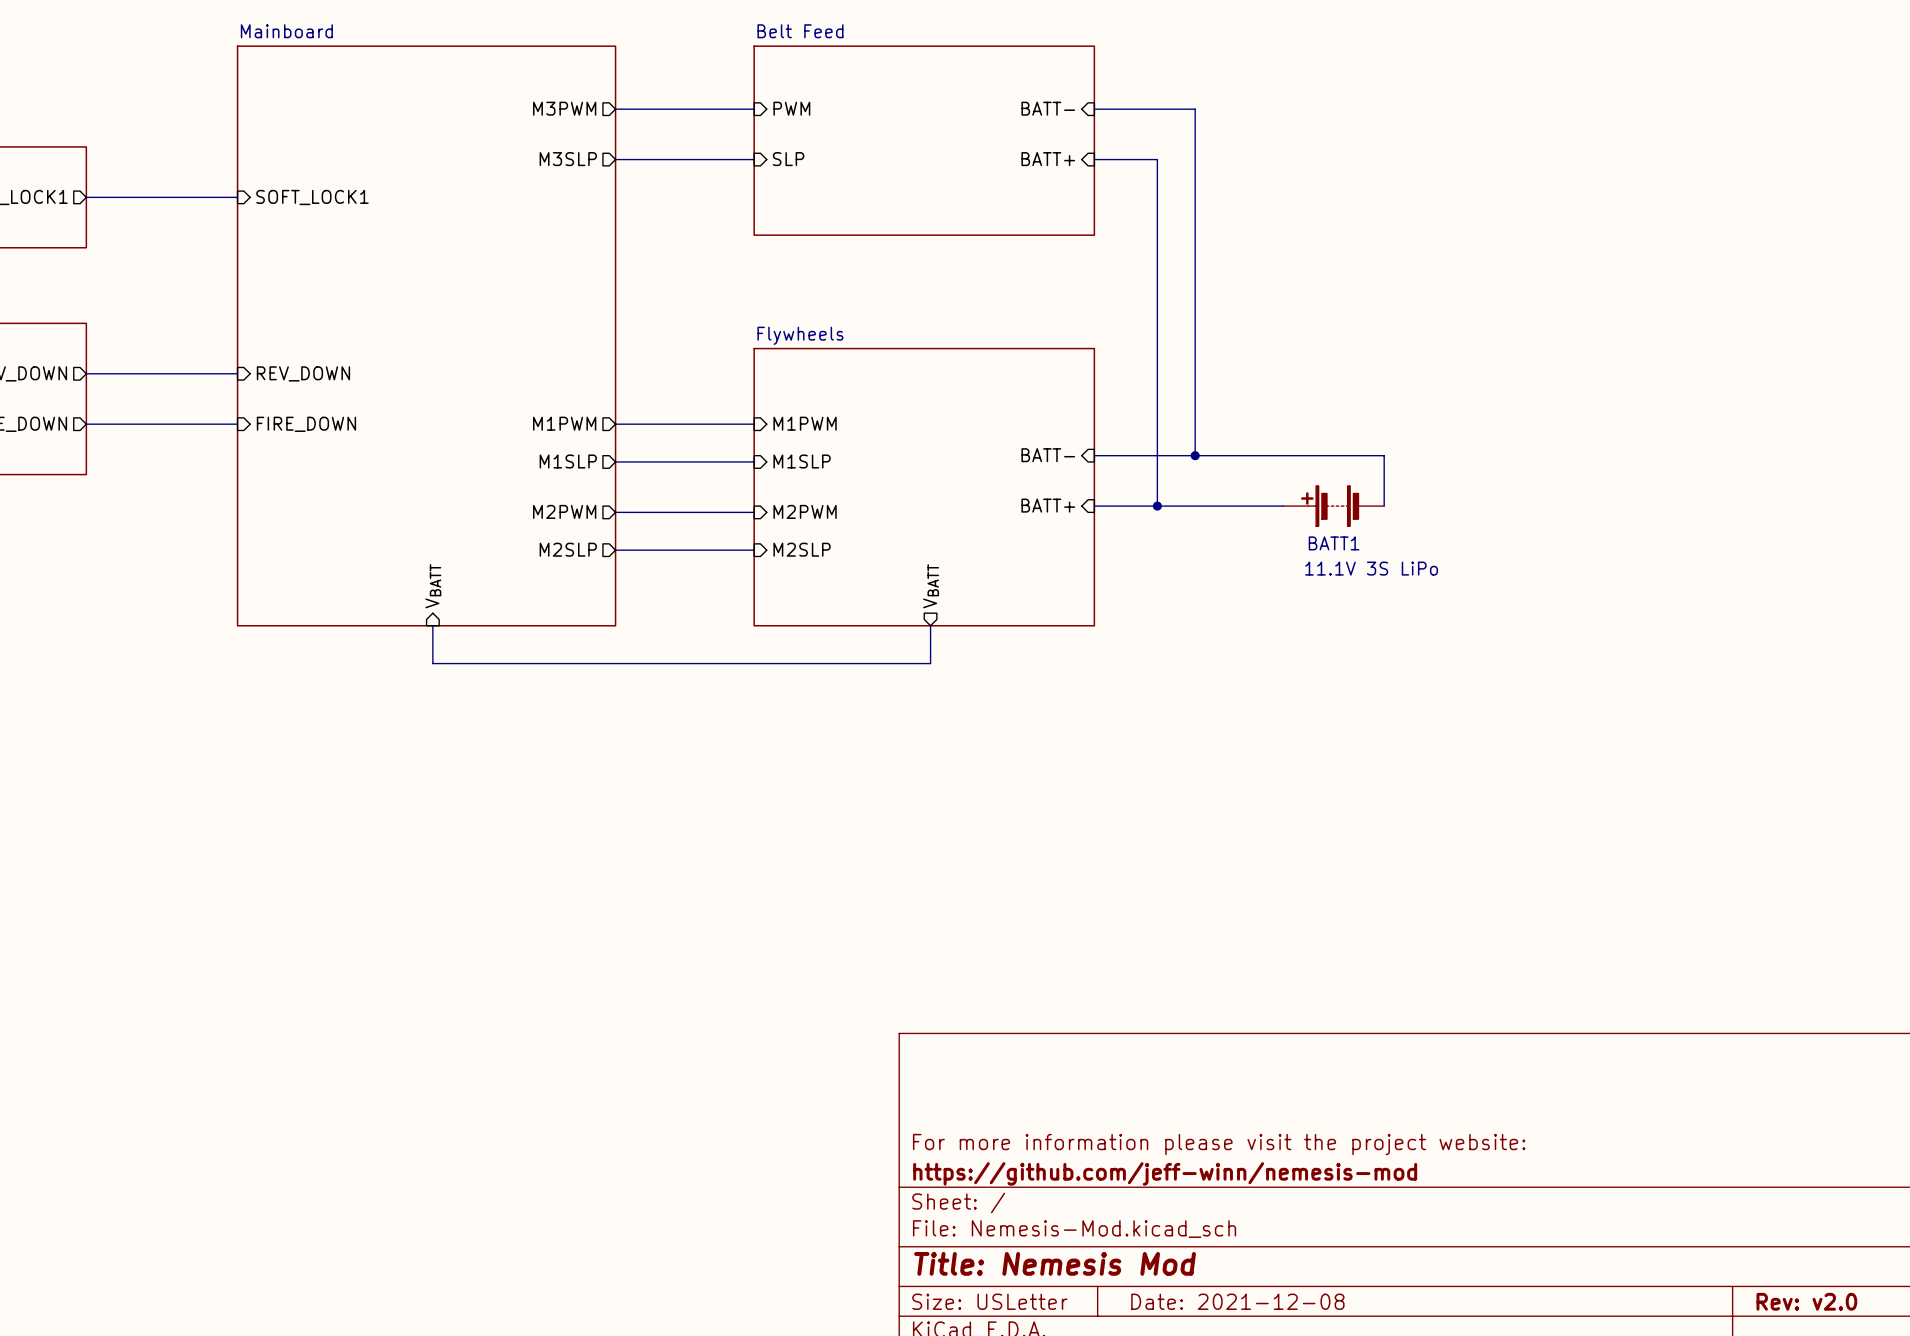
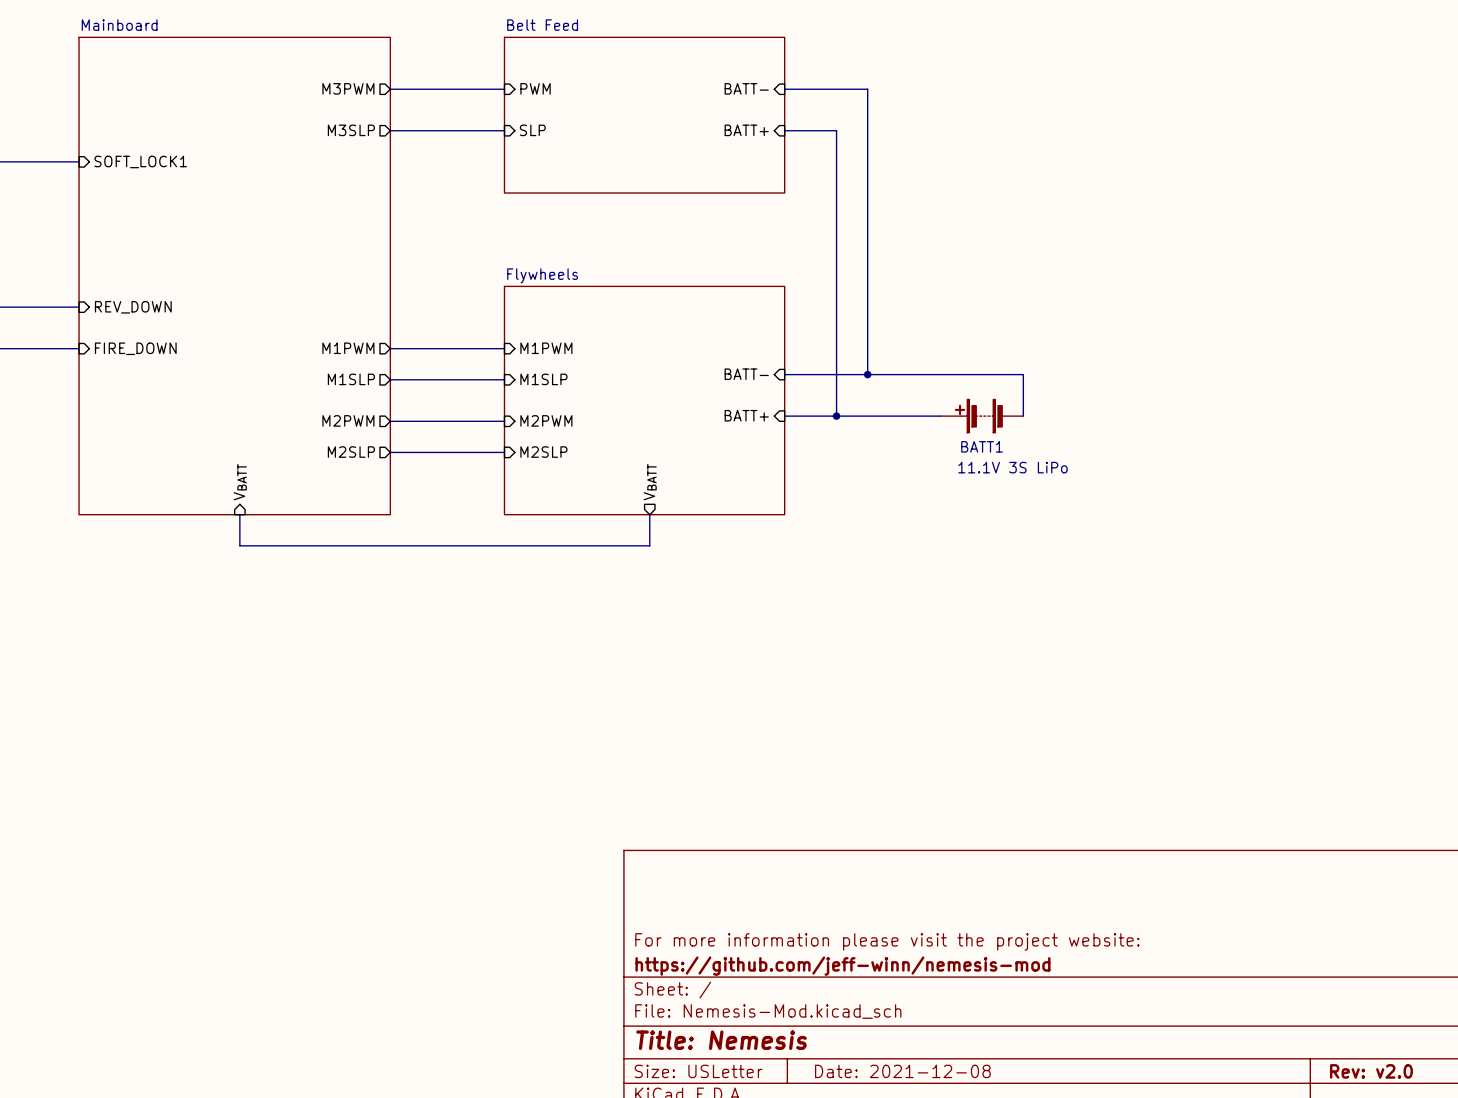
title block: Title: Nemesis Mod (1055, 1263) -> Title: Nemesis (721, 1040)

